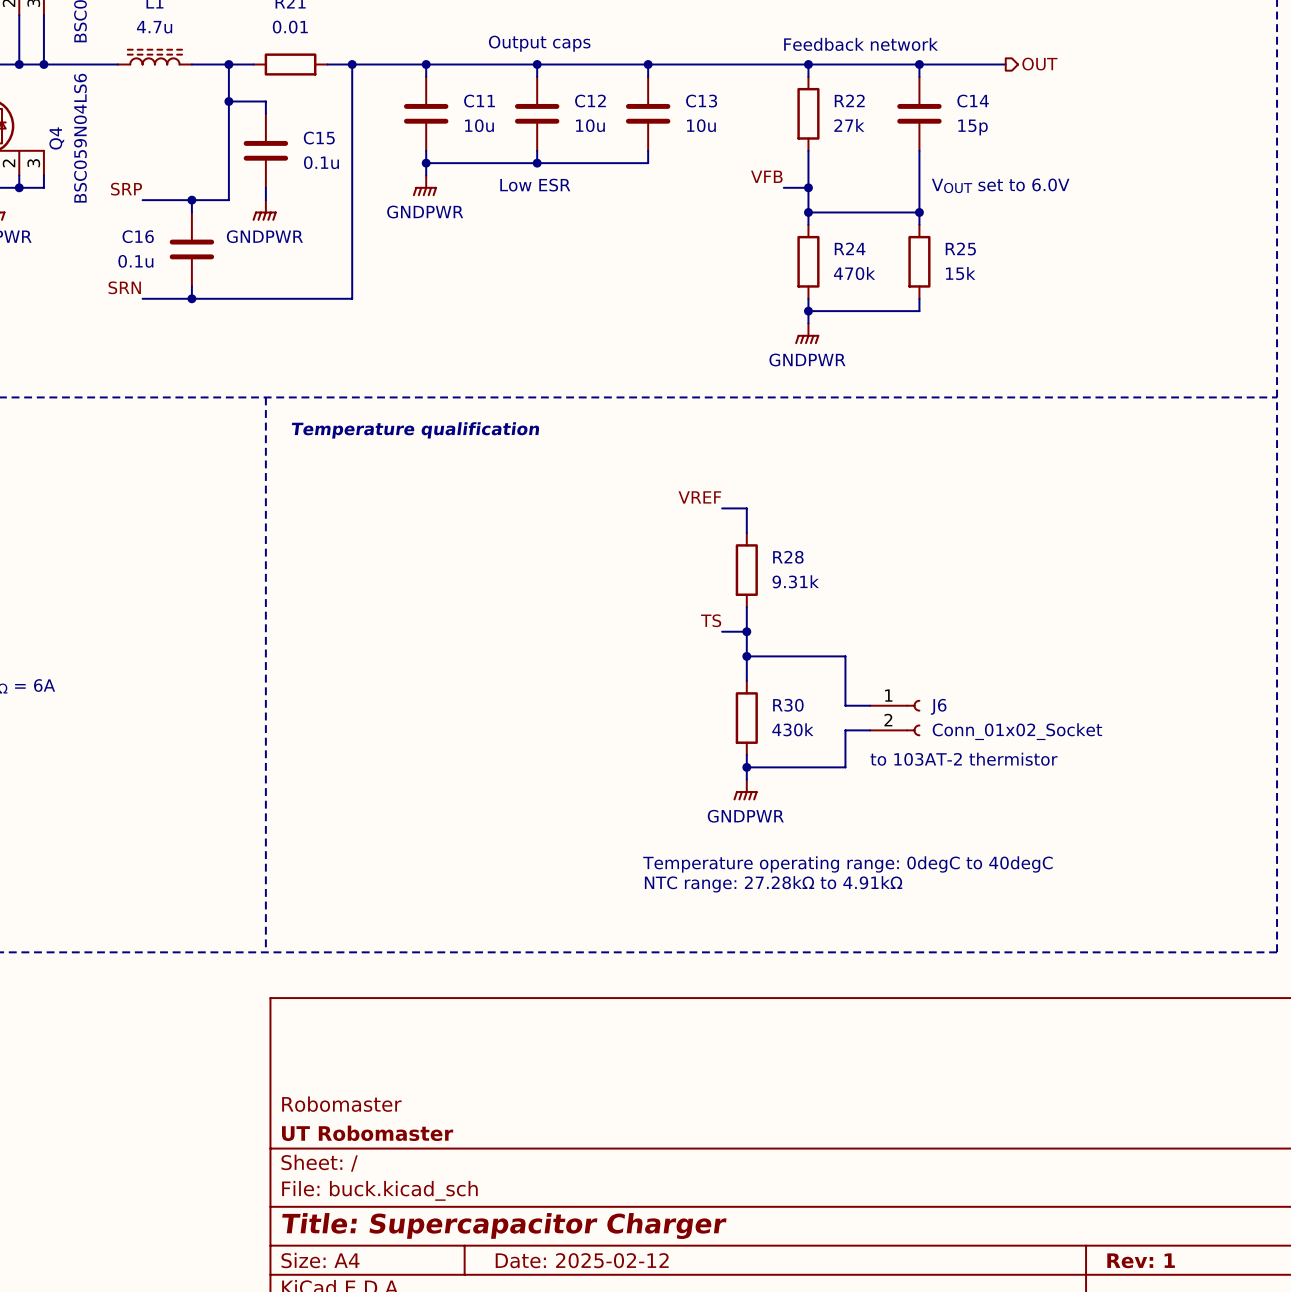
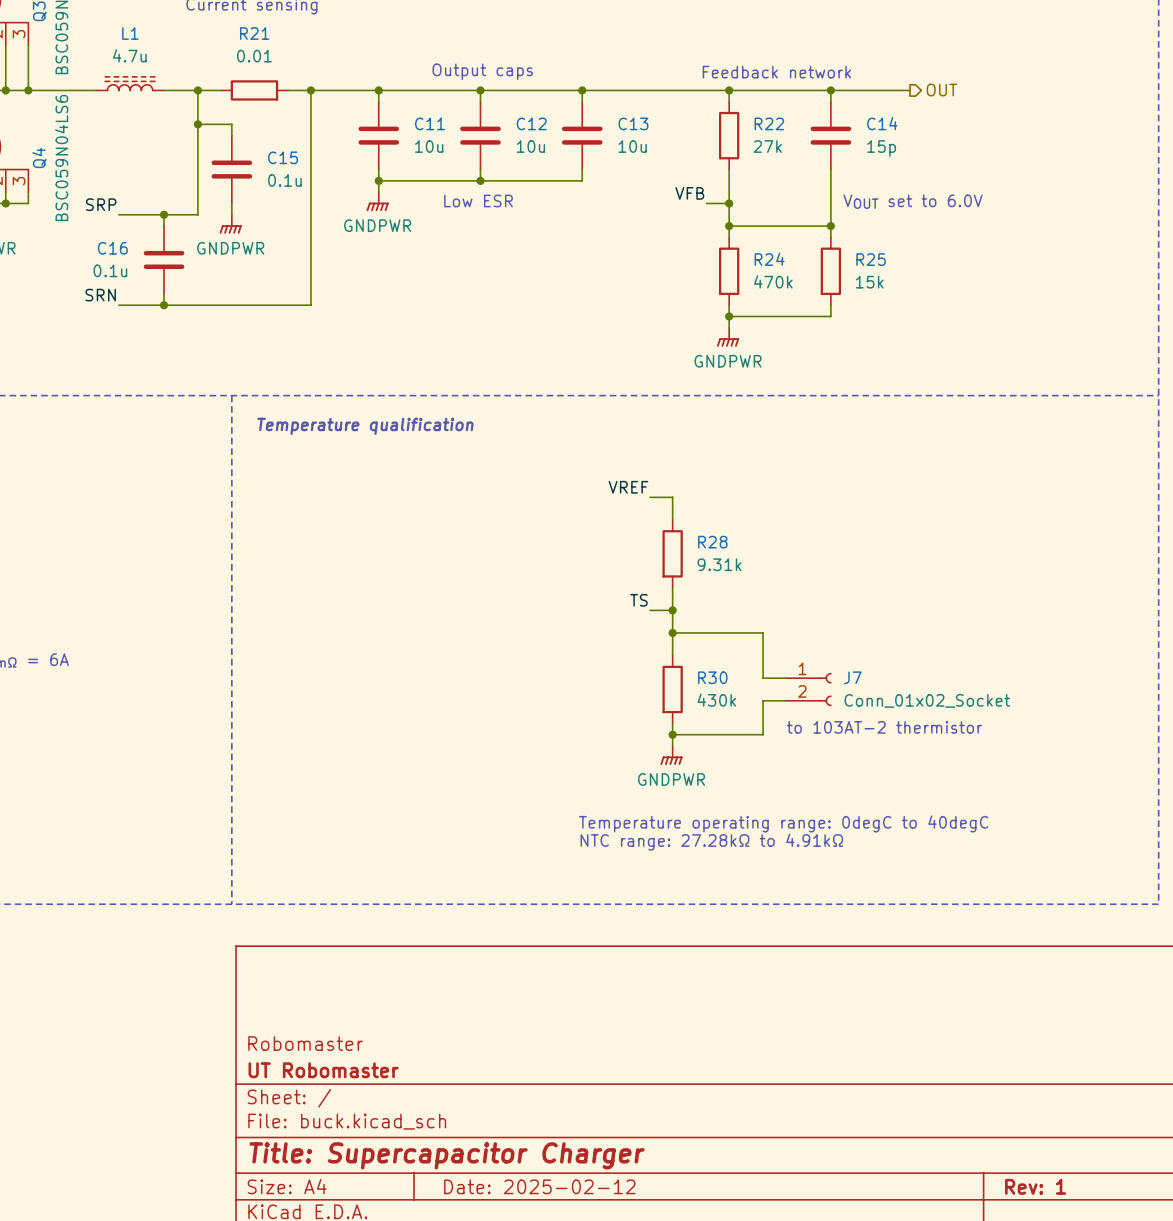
J6 name: J6 (938, 706) -> J7 (852, 677)

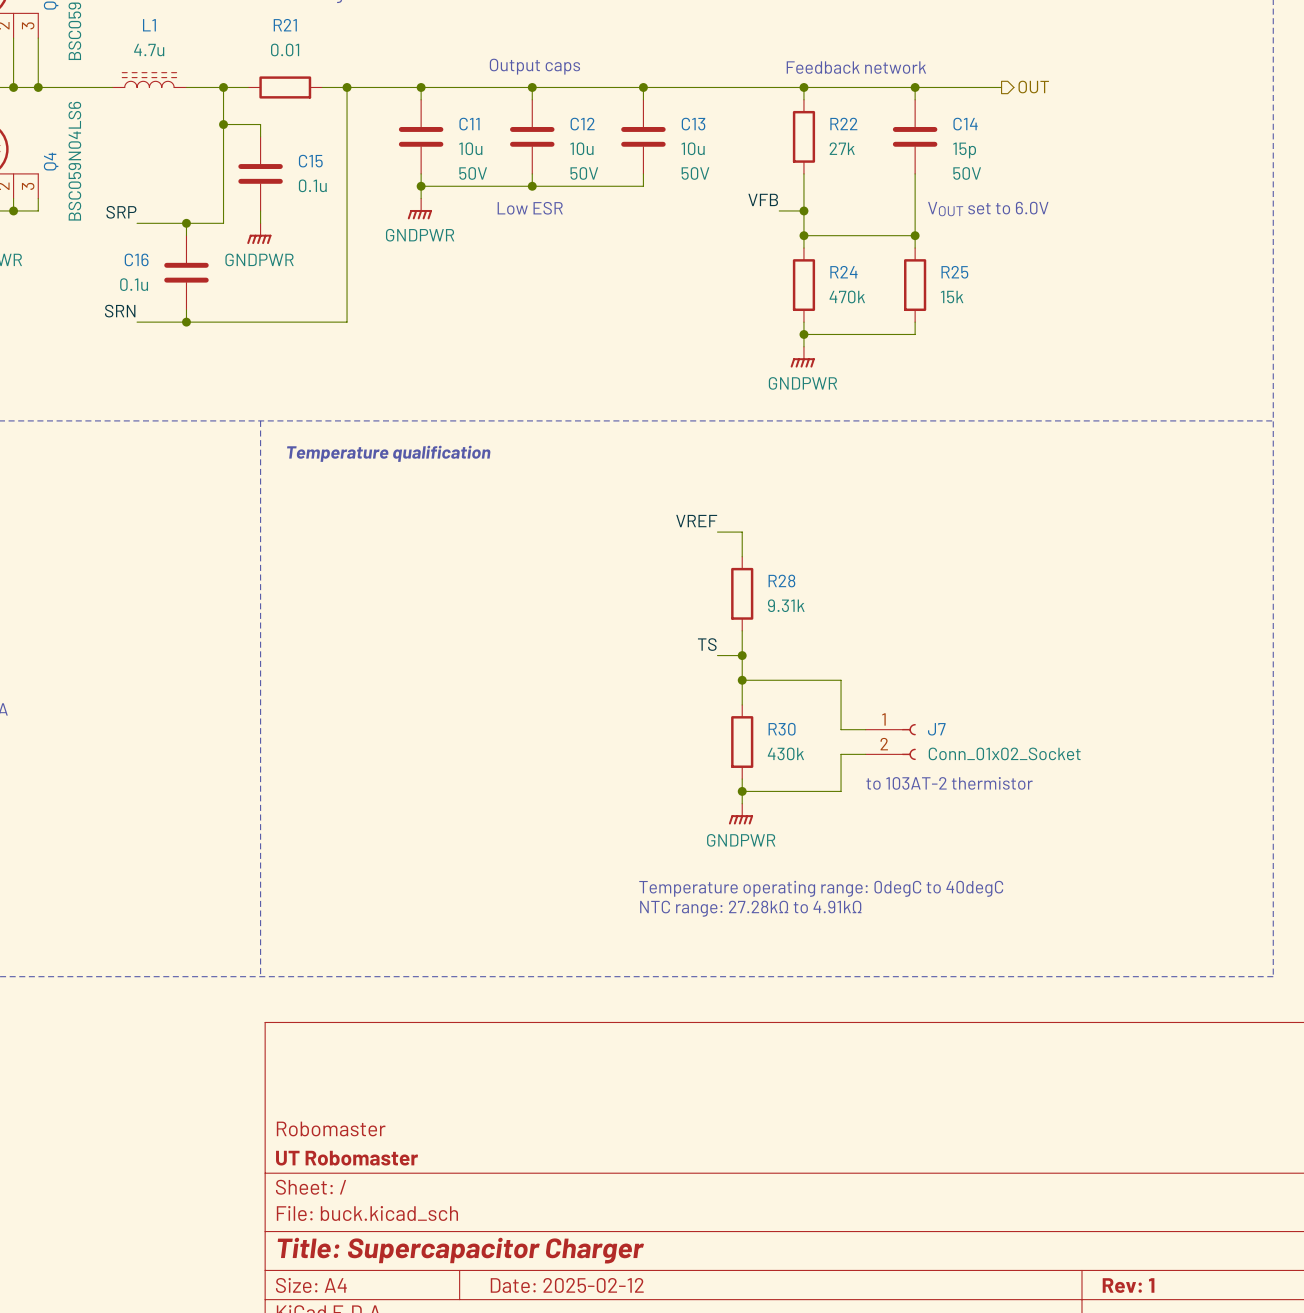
C11 text: none -> 50V (473, 173)
C12 text: none -> 50V (584, 173)
C13 text: none -> 50V (695, 173)
C14 text: none -> 50V (967, 173)

